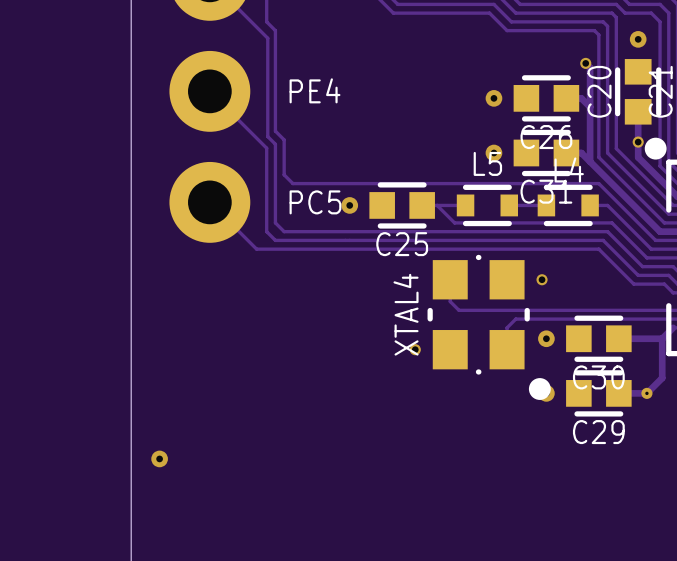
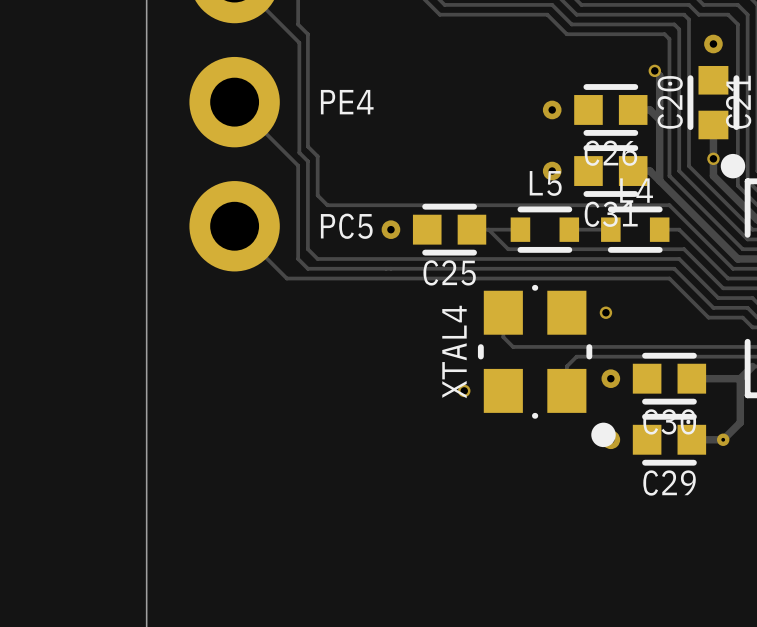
via: (159, 458) -> none

